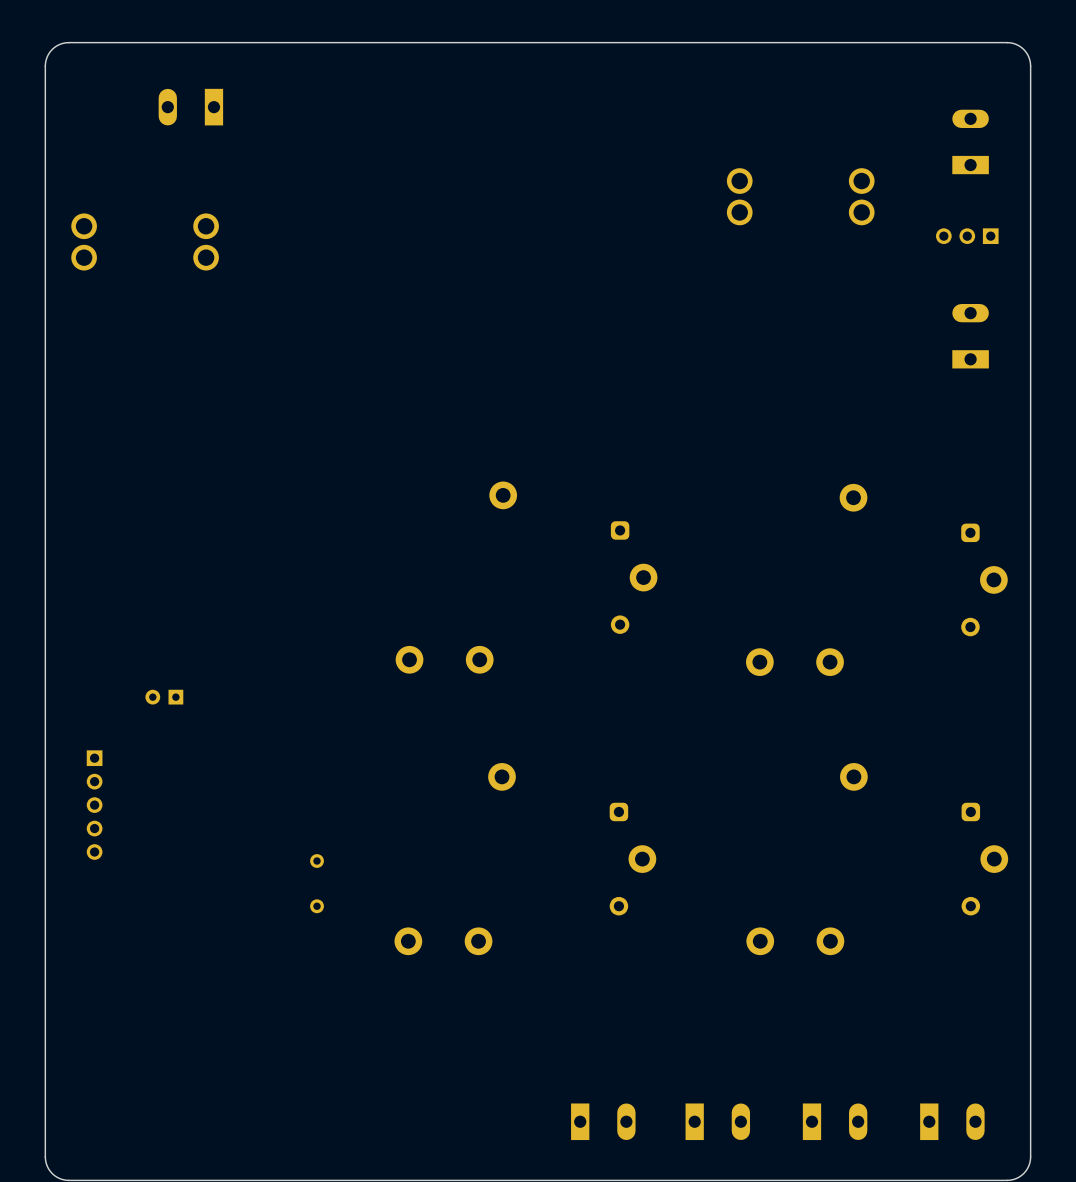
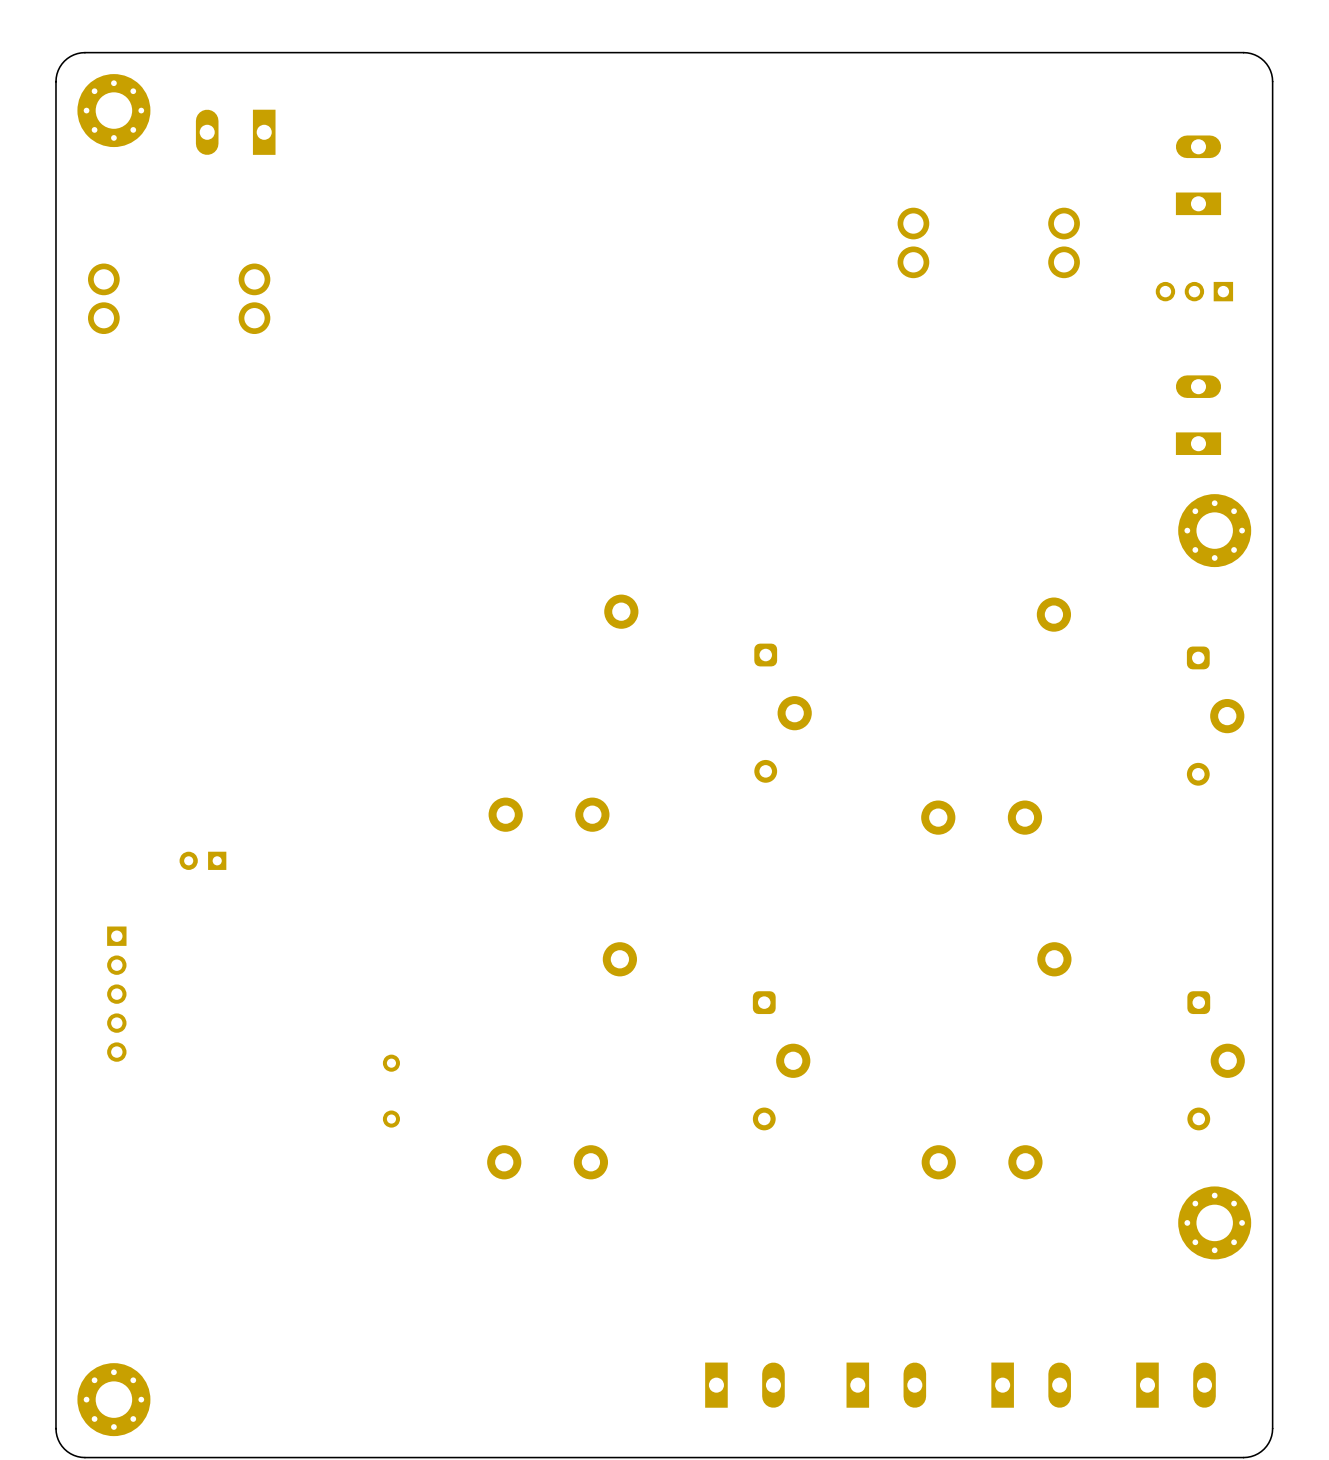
part: none -> (113, 110)
part: none -> (1214, 530)
part: none -> (1214, 1222)
part: none -> (113, 1399)

